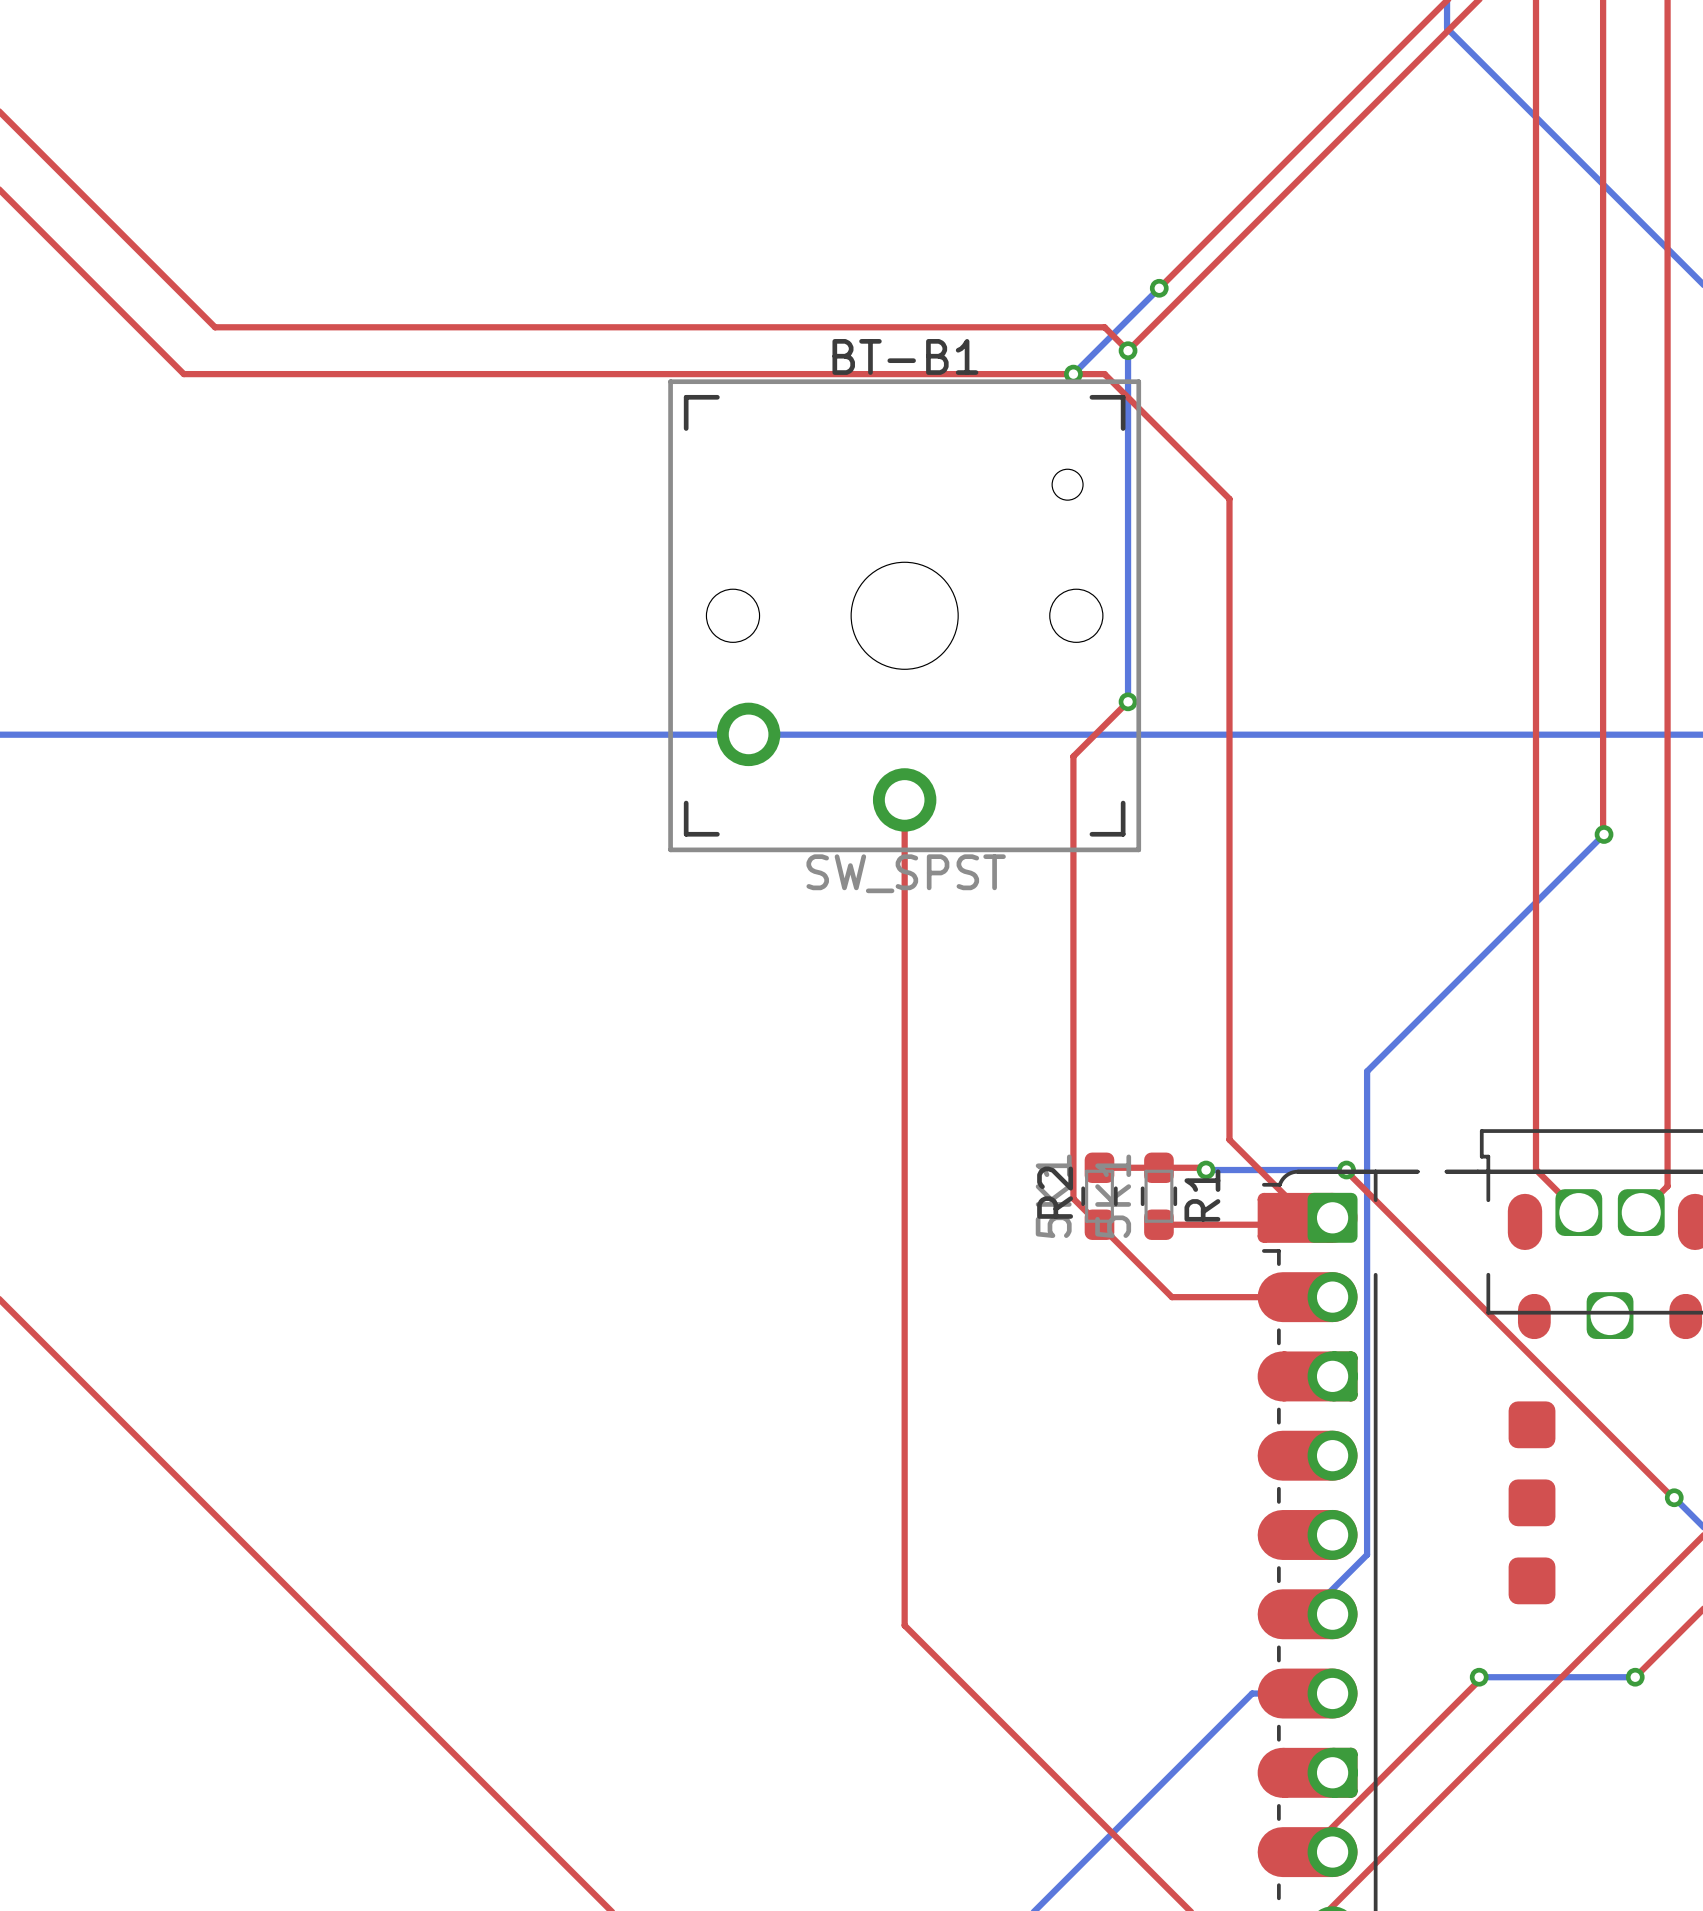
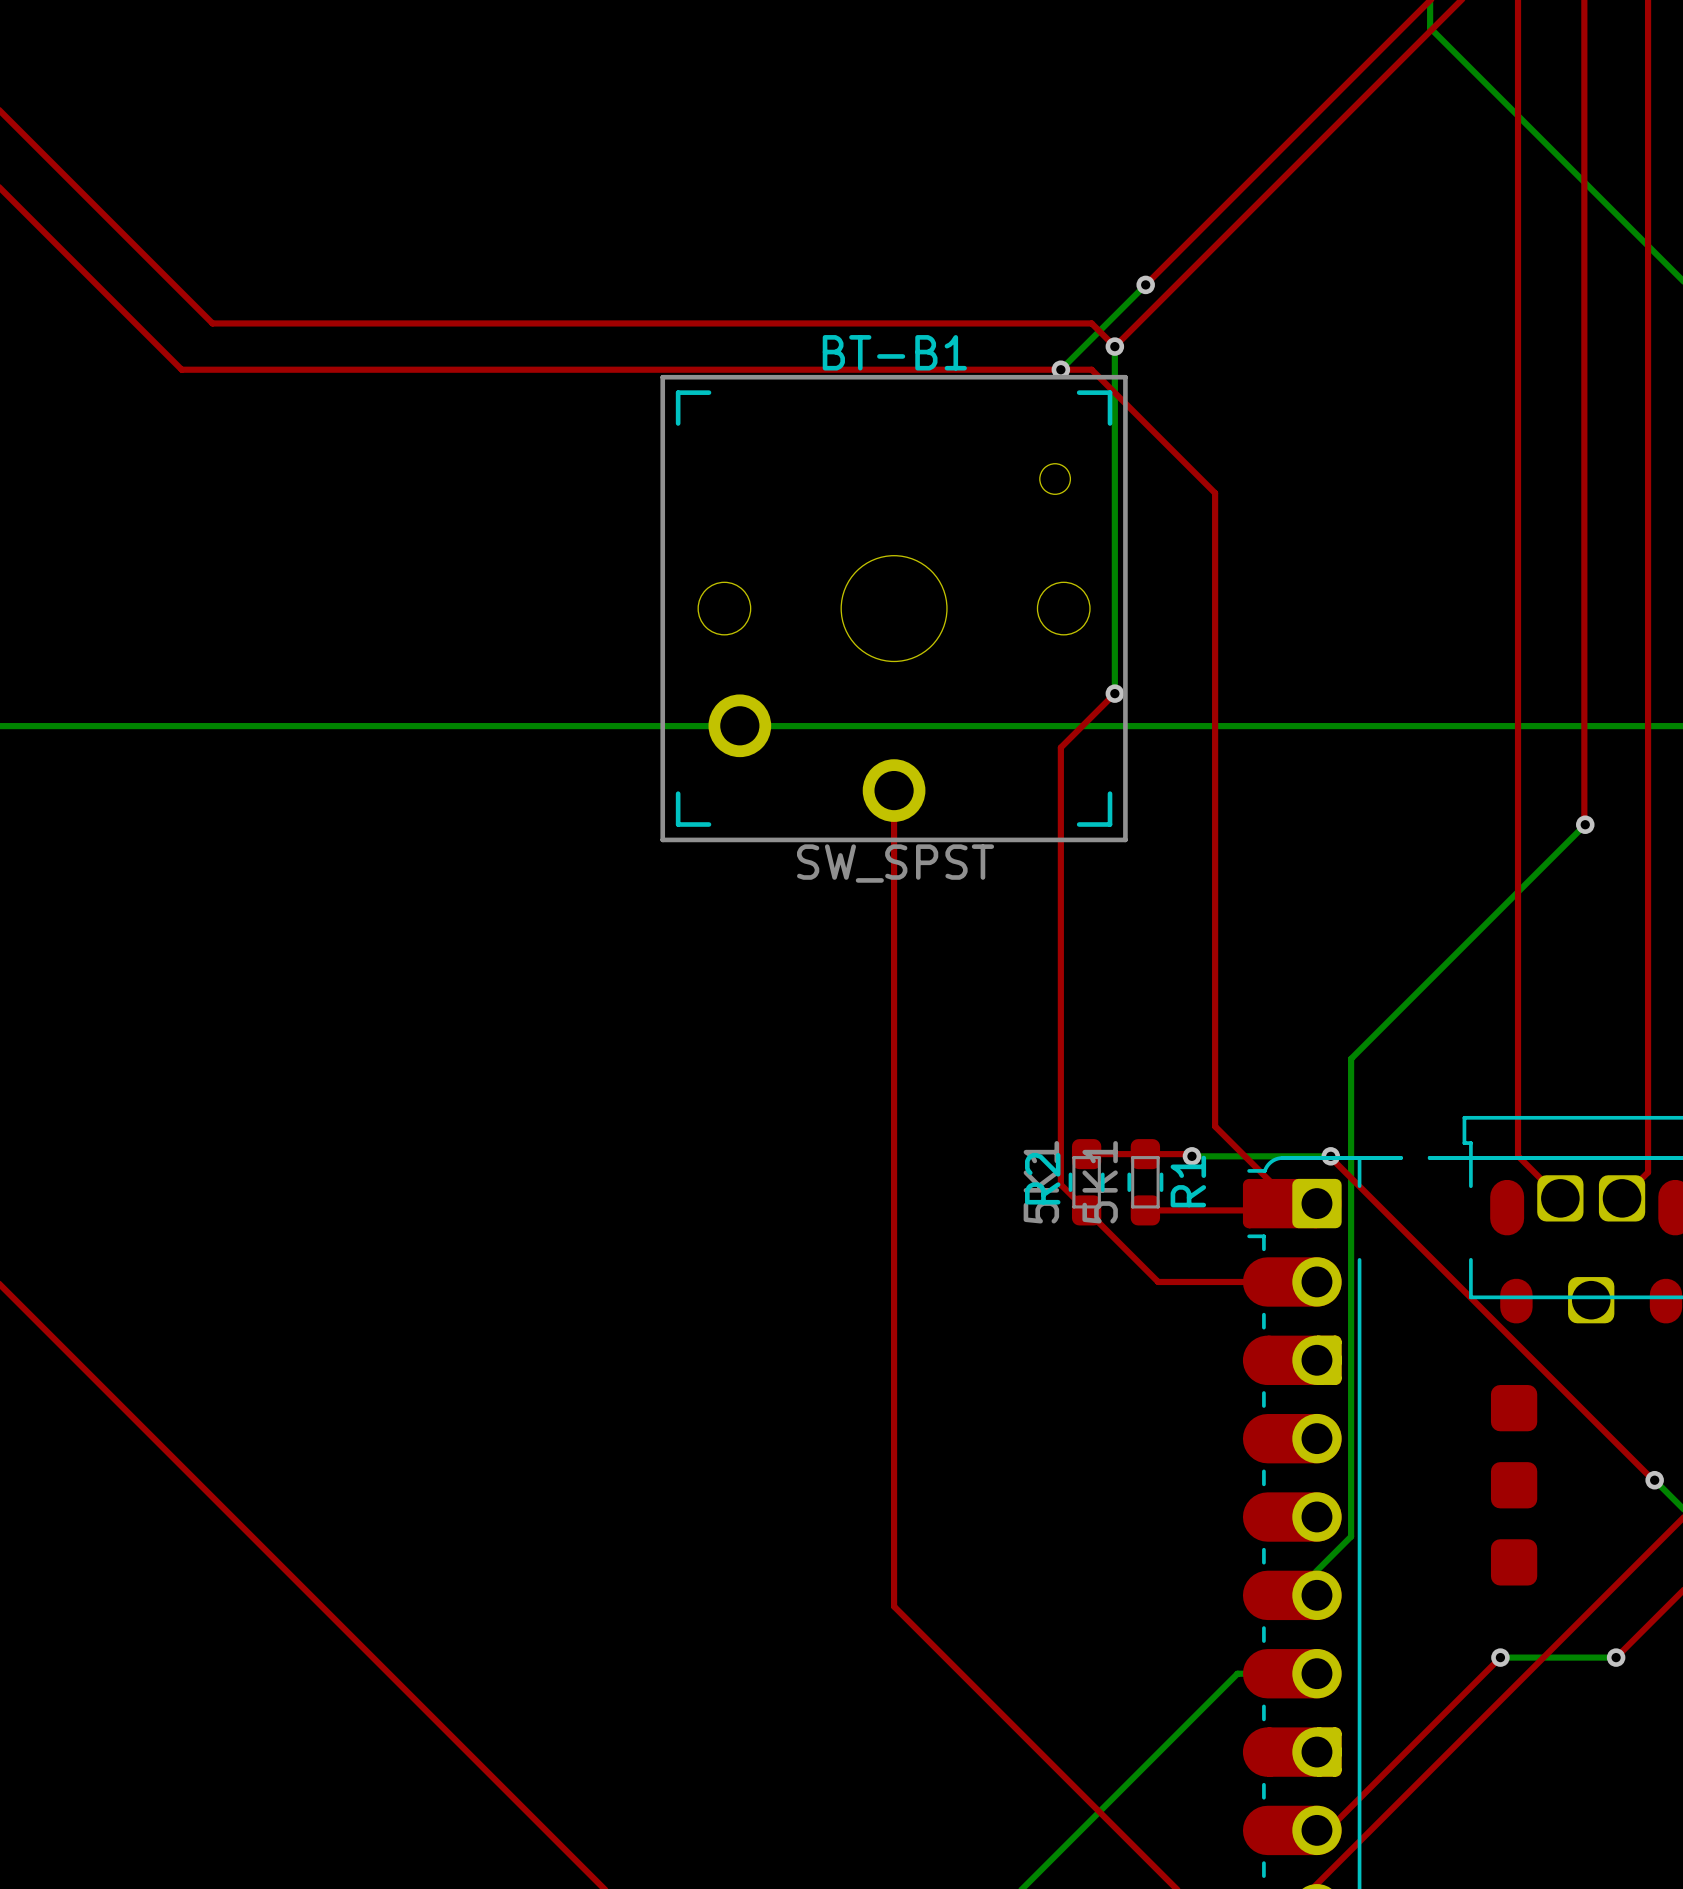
top track: (1479, 1677) (1479, 1680) (1307, 1852) -> (1500, 1657) (1327, 1830) (1292, 1830)
bottom track: (1479, 1677) (1518, 1677) -> none
via position: (1479, 1677) -> (1500, 1657)

